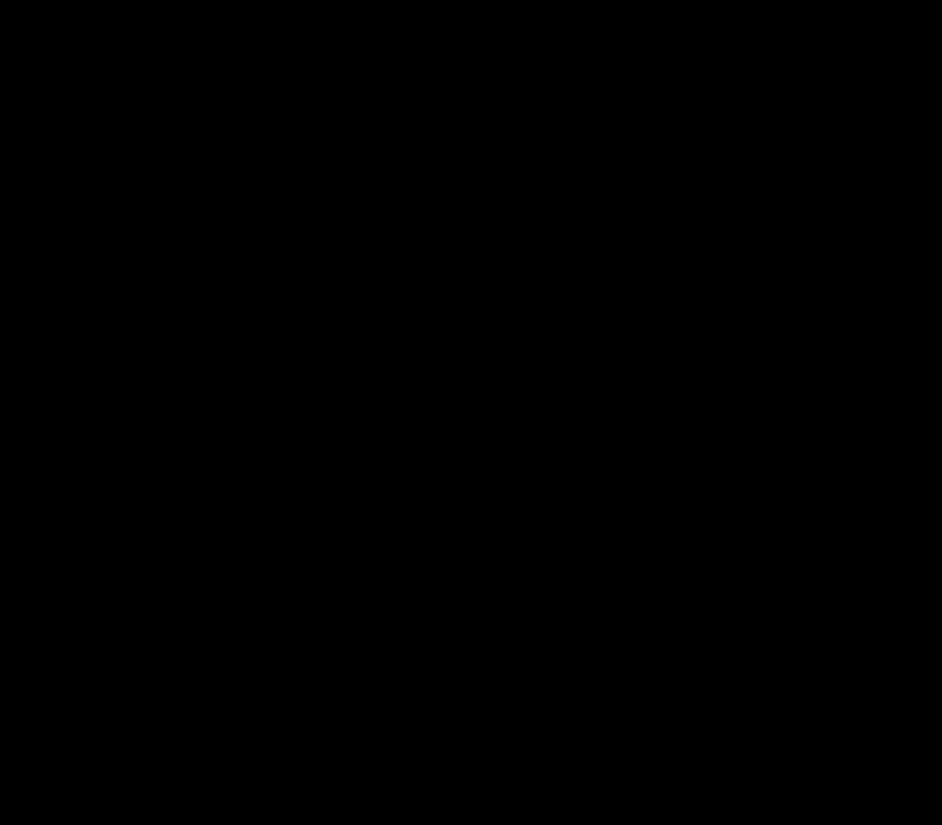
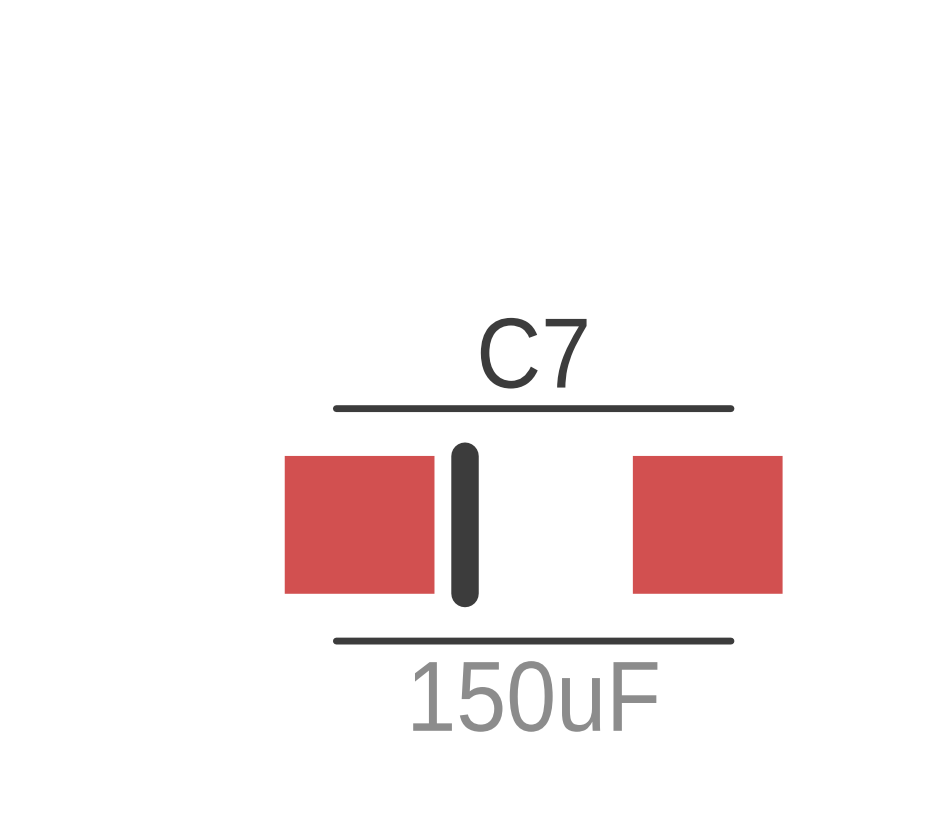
C7: none -> 150uF (533, 524)

